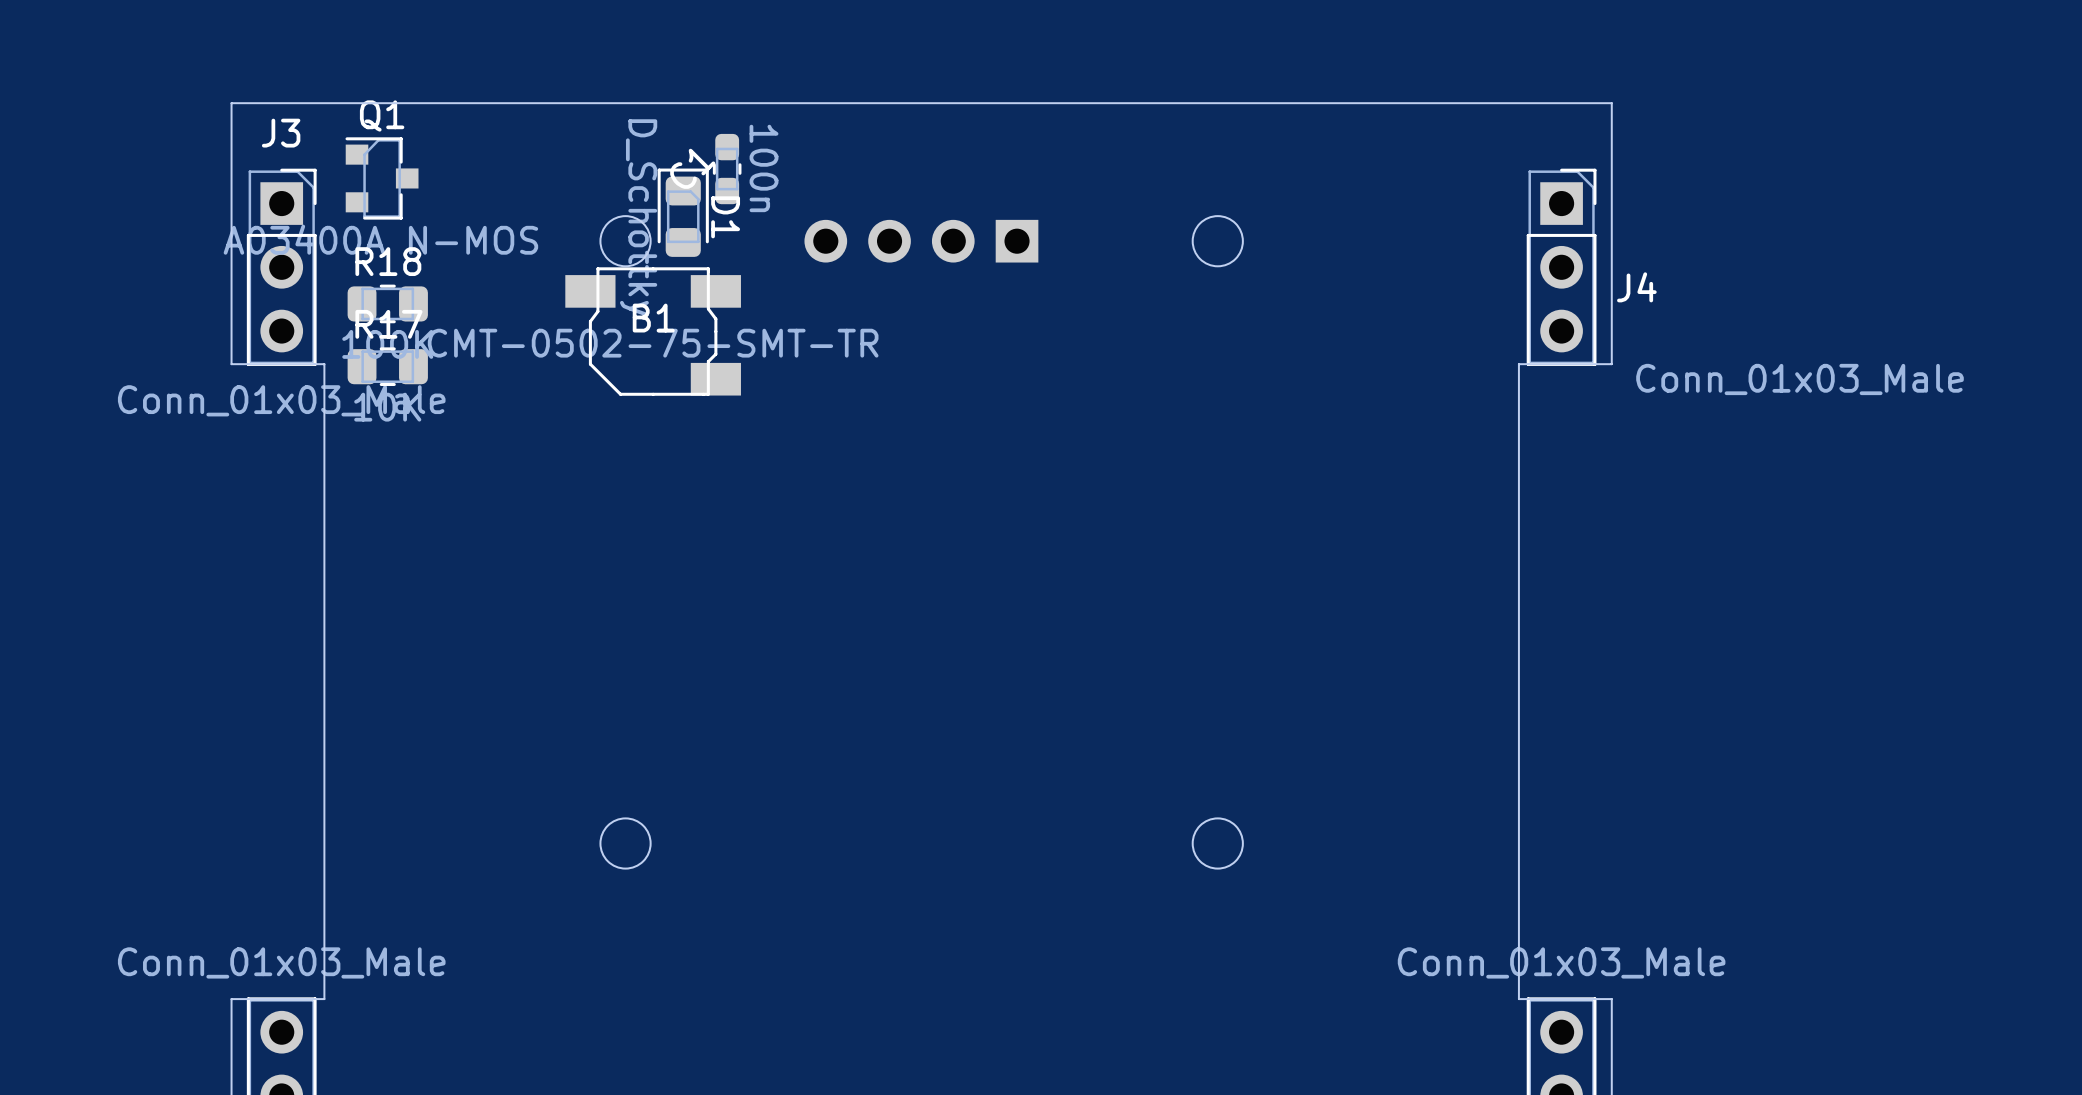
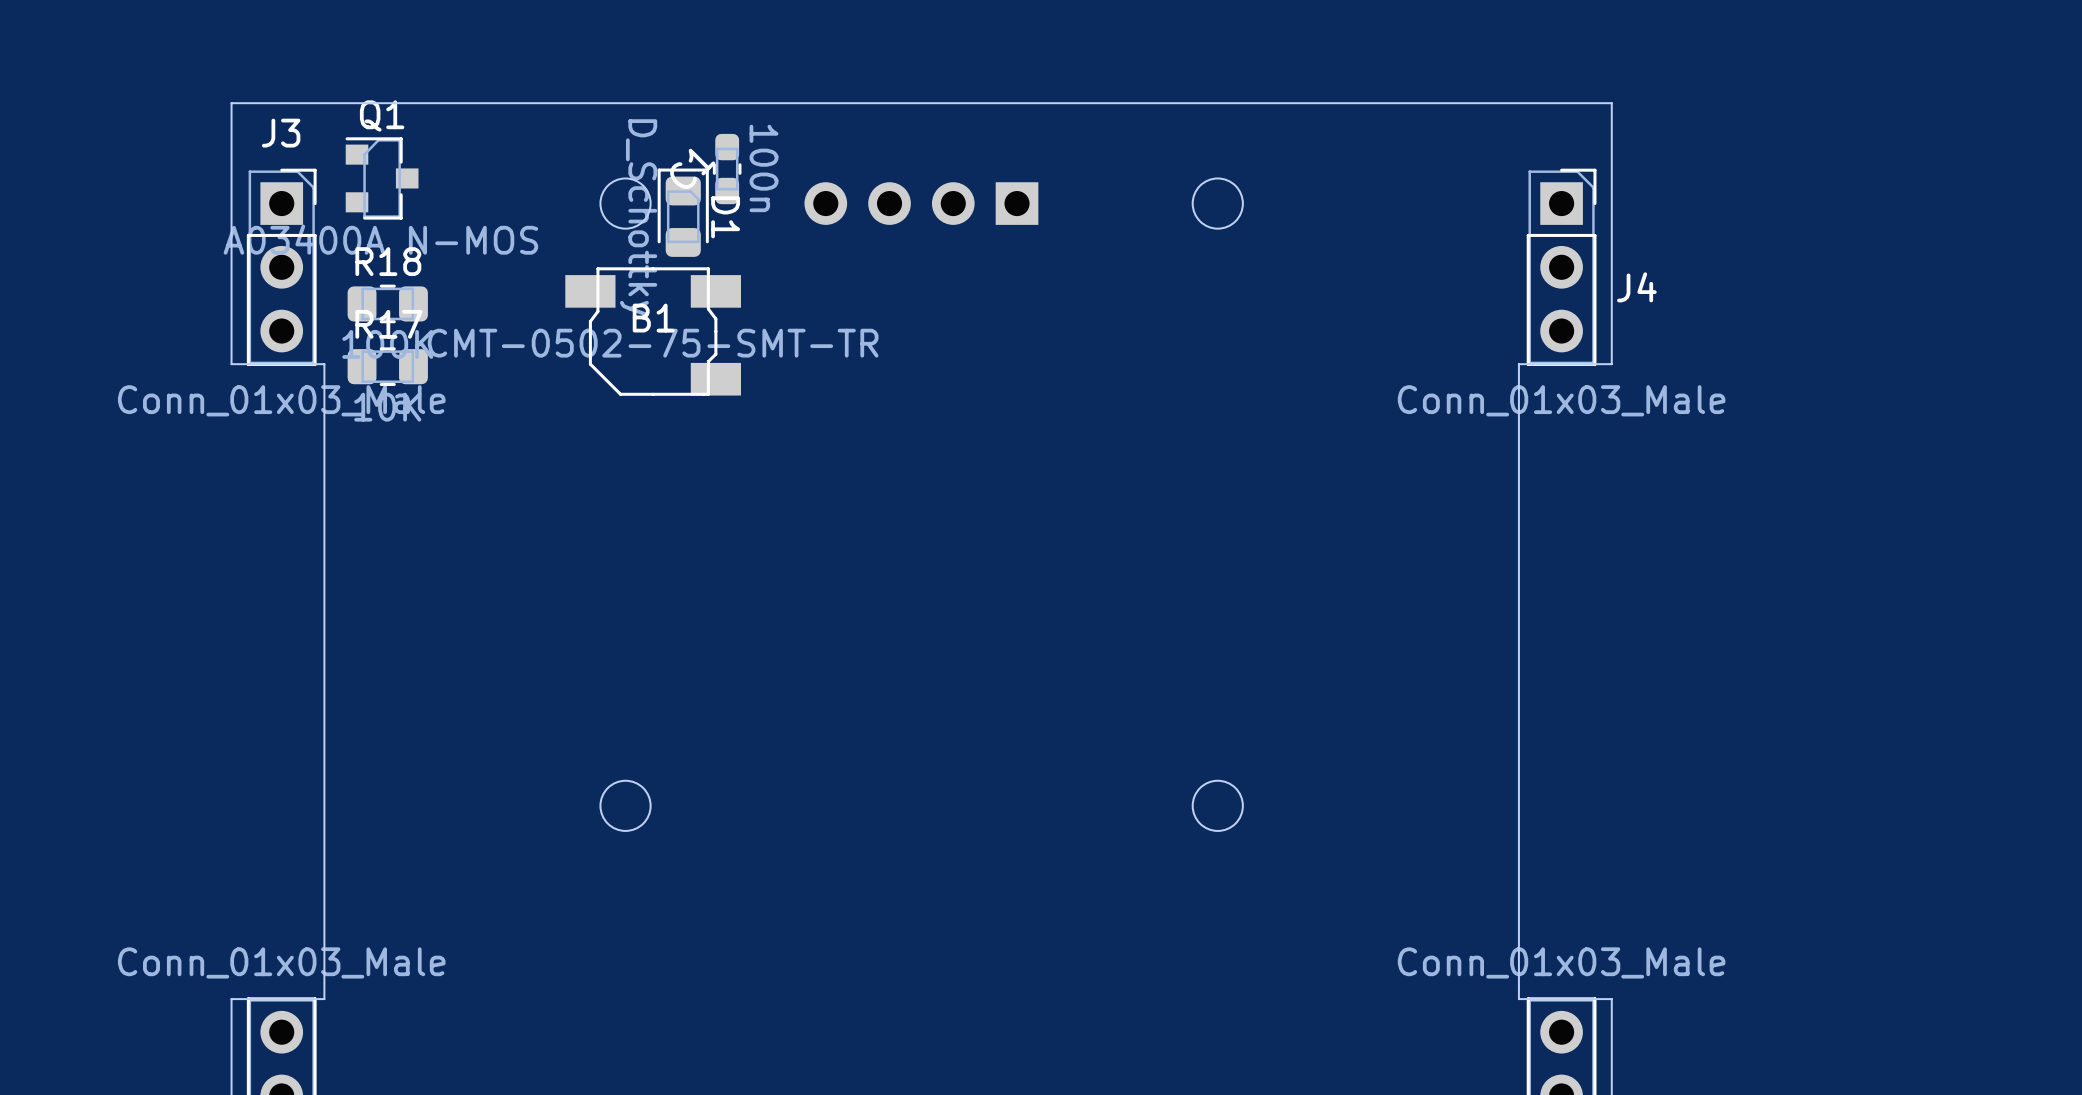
round board edge position: (625, 241) -> (625, 203)
part position: (921, 241) -> (921, 203)
round board edge position: (1217, 241) -> (1217, 203)
J4 value position: Conn_01x03_Male (1800, 379) -> Conn_01x03_Male (1561, 400)
round board edge position: (625, 843) -> (625, 805)
round board edge position: (1217, 843) -> (1217, 805)

